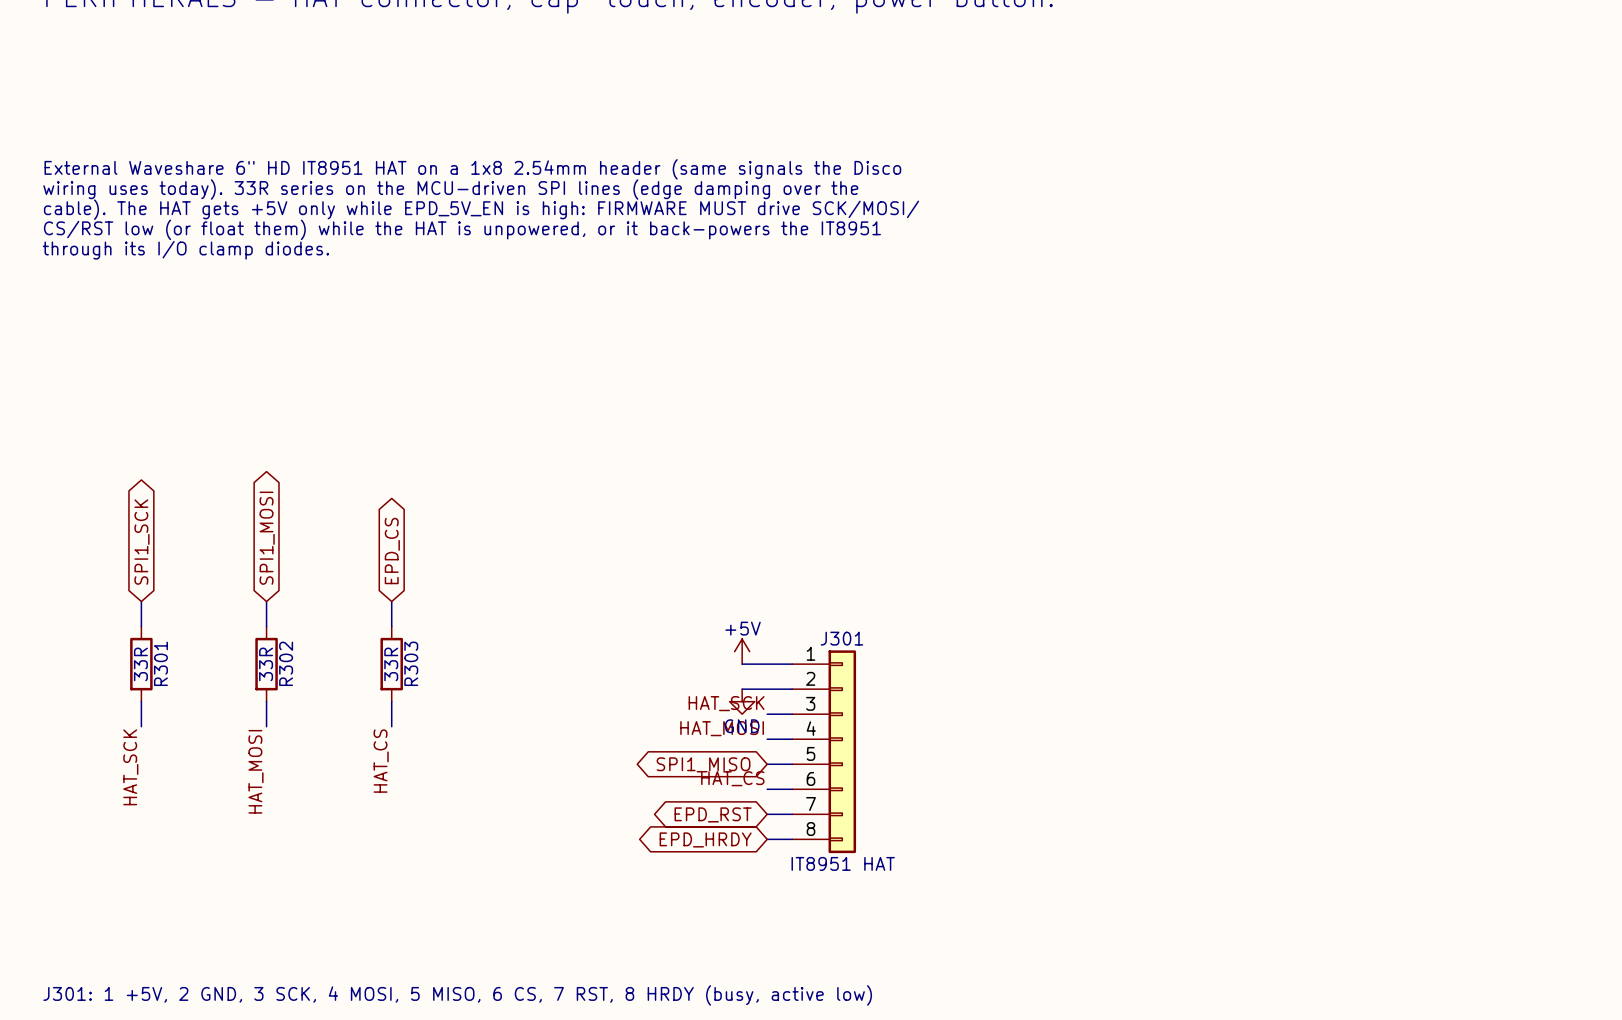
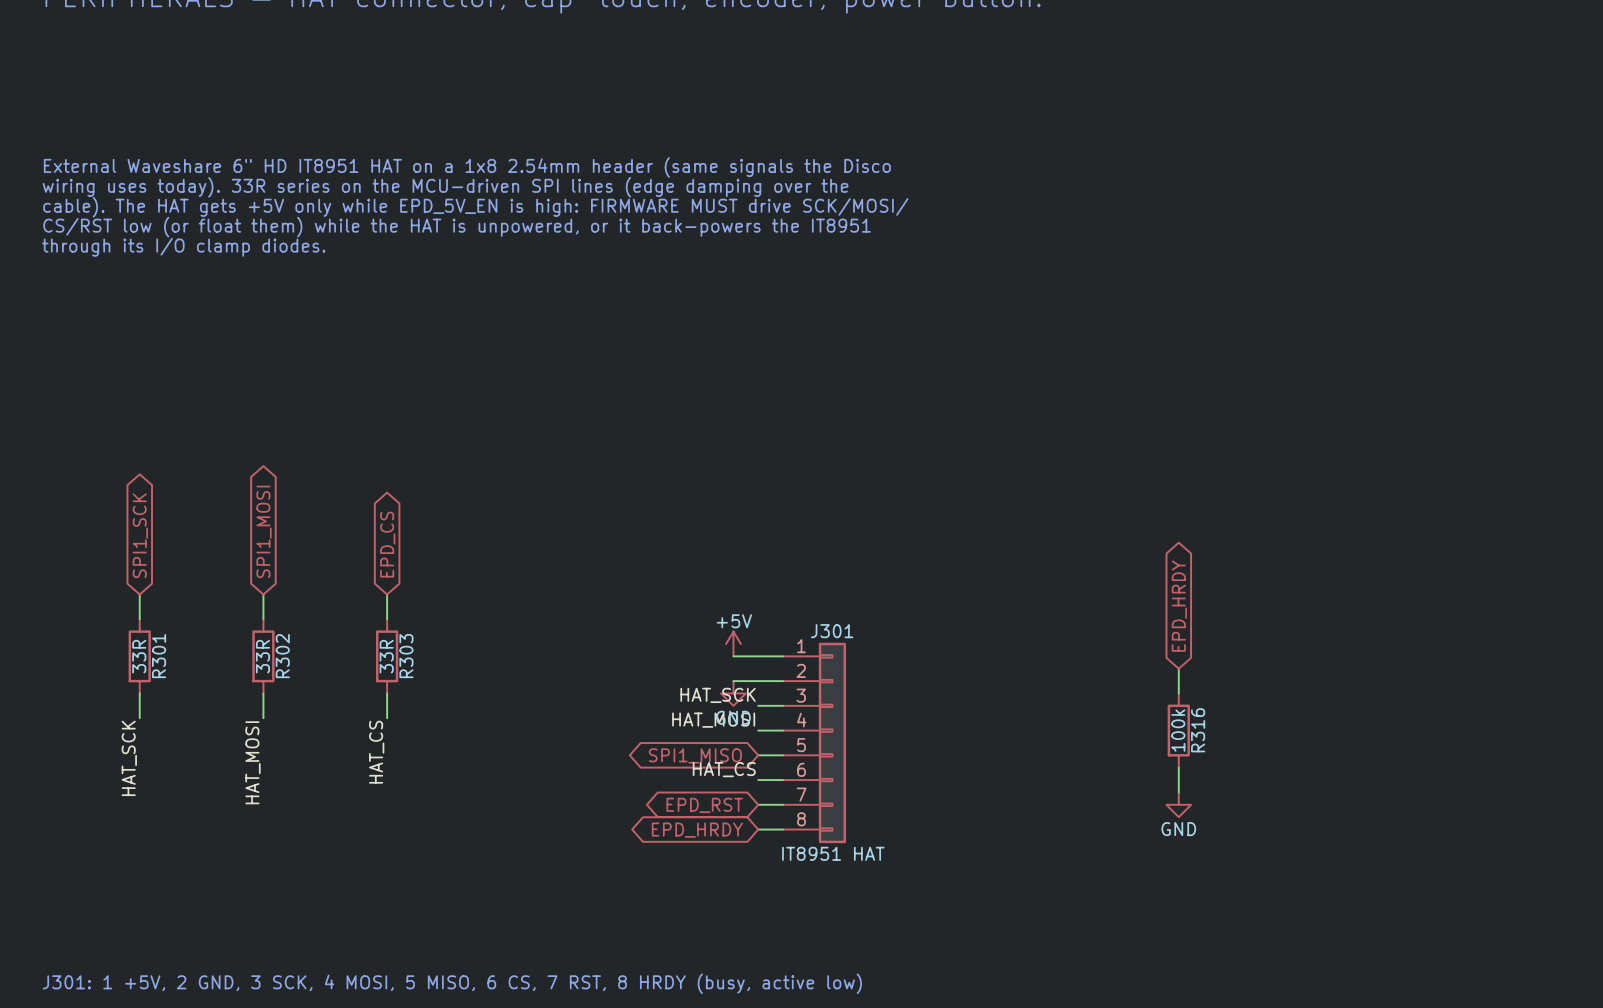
global label: none -> EPD_HRDY (1179, 606)
wire: none -> (1178, 668) (1178, 693)
R316: none -> 100k (1178, 730)
wire: none -> (1178, 767) (1178, 792)
power symbol: none -> GND (1178, 804)

